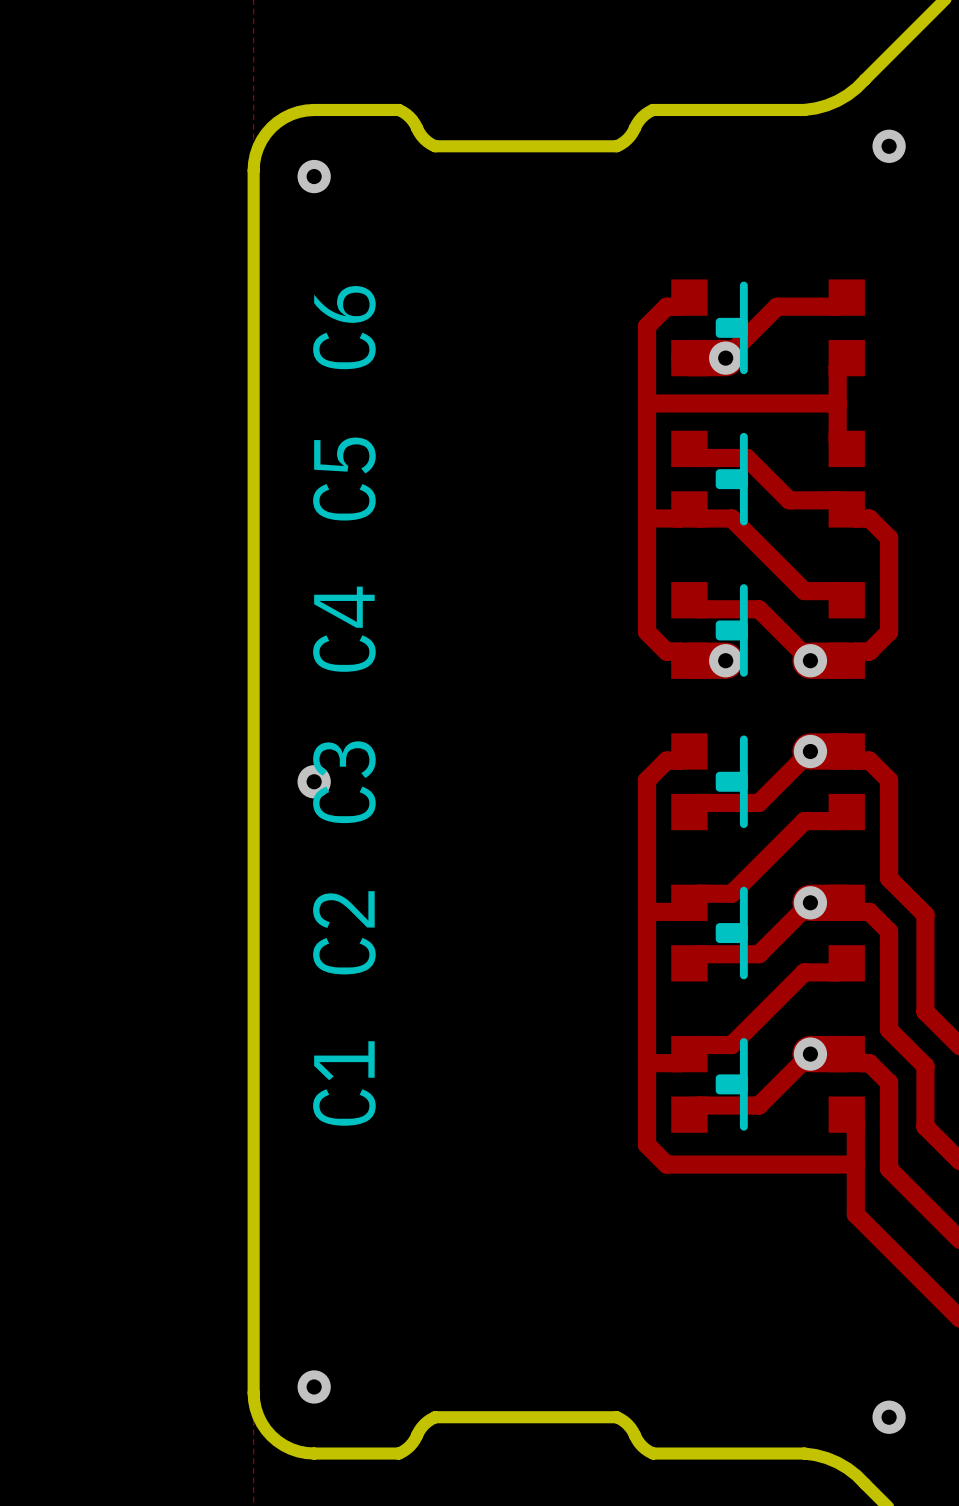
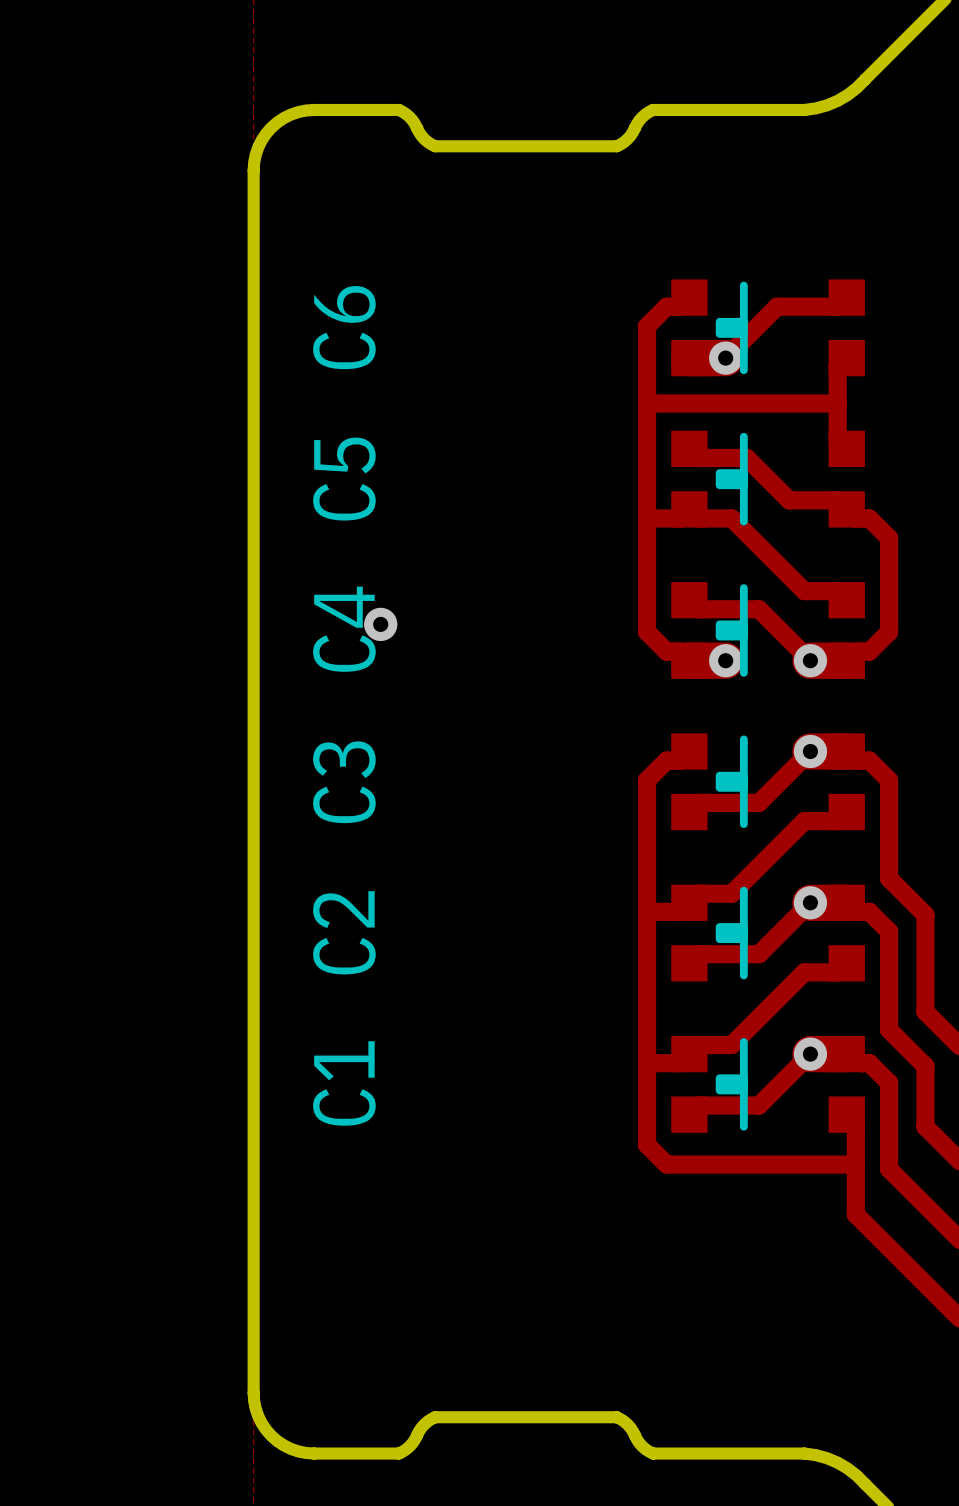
via: (889, 146) -> none
via: (314, 176) -> none
via position: (314, 781) -> (380, 624)
via: (314, 1386) -> none
via: (889, 1417) -> none

